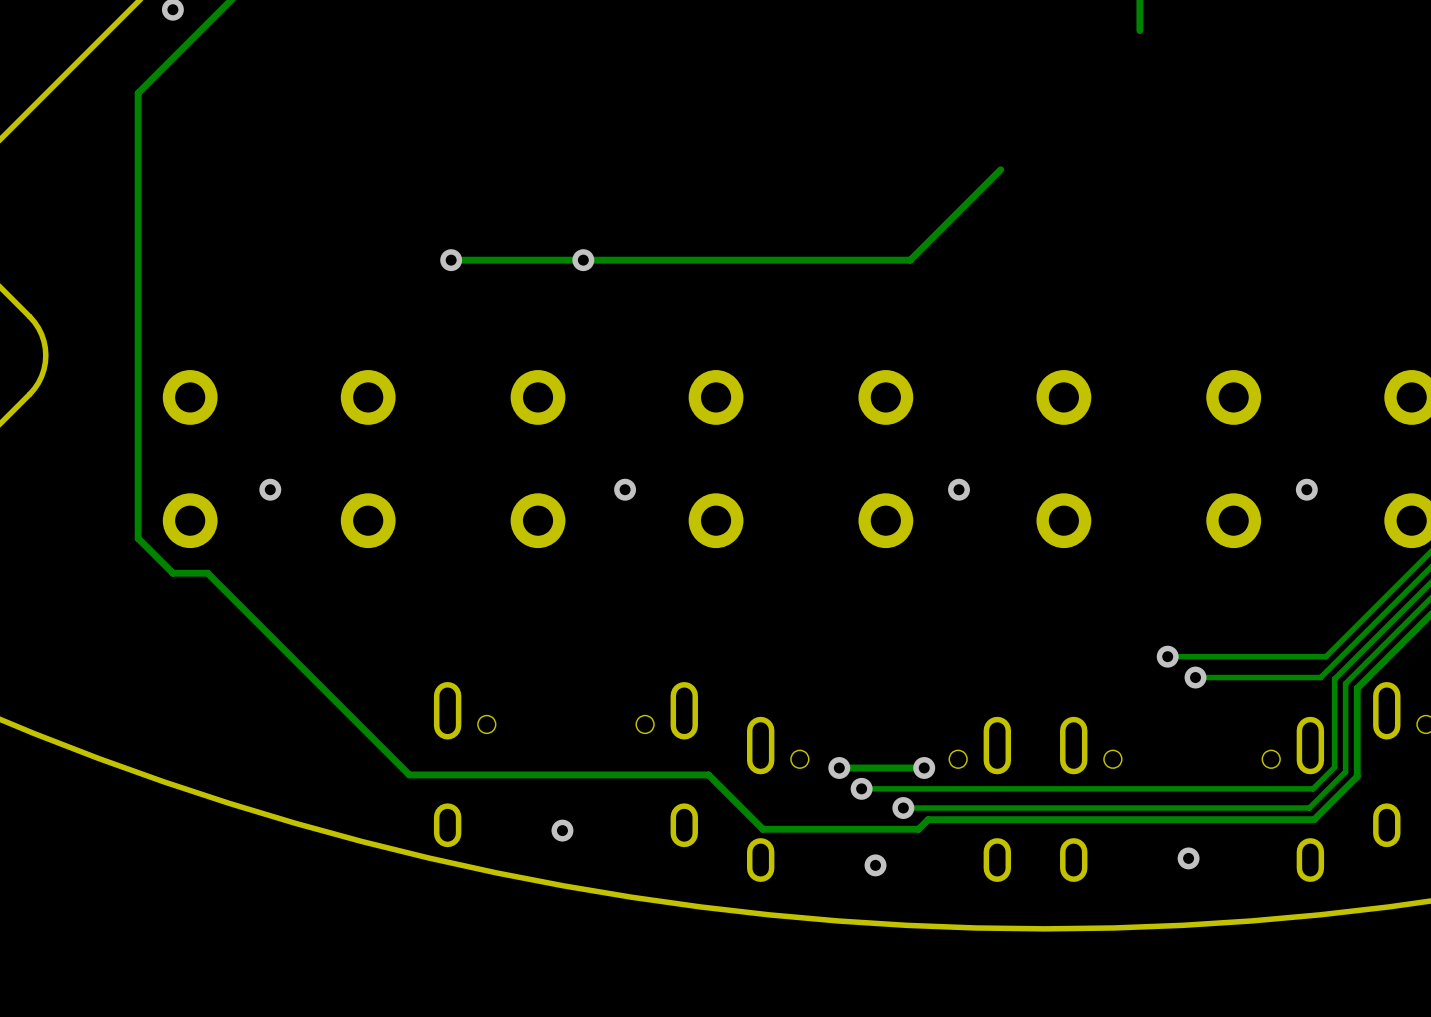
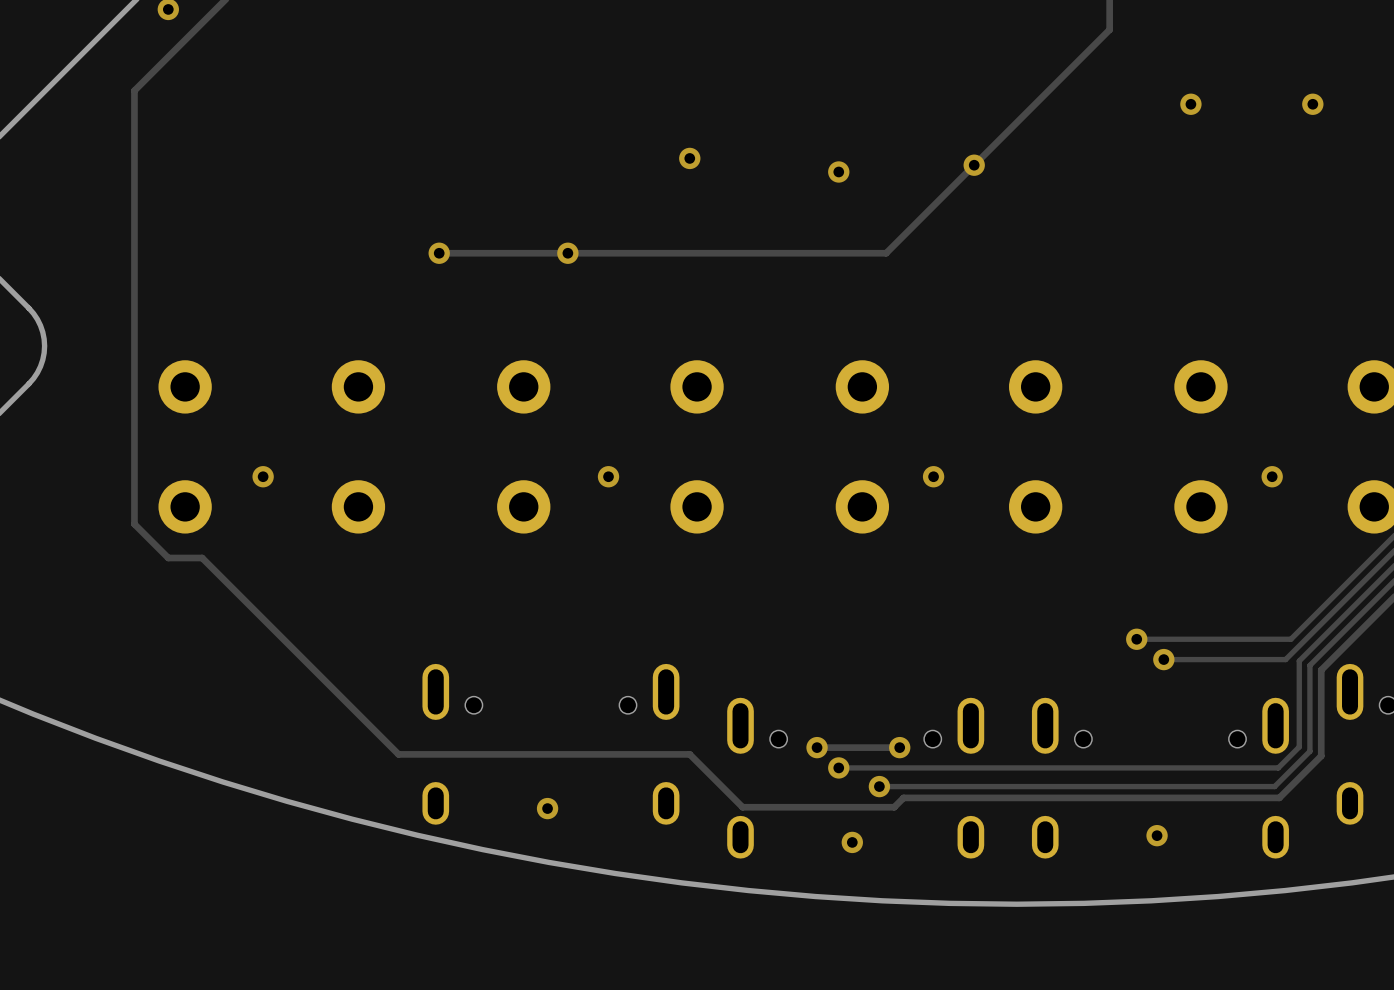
track: none -> (1109, 29) (974, 165)
via: none -> (1190, 104)
via: none -> (1312, 104)
via: none -> (689, 158)
via: none -> (974, 165)
via: none -> (838, 171)

